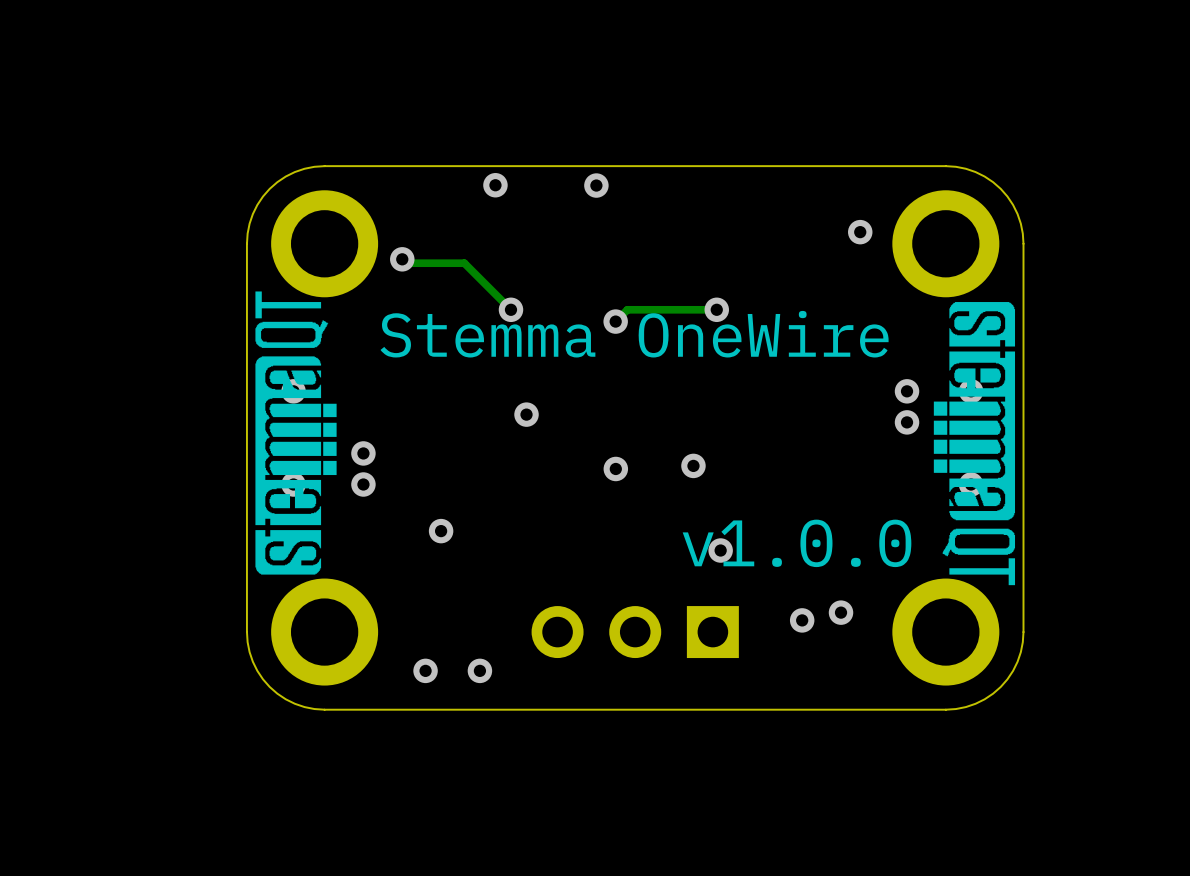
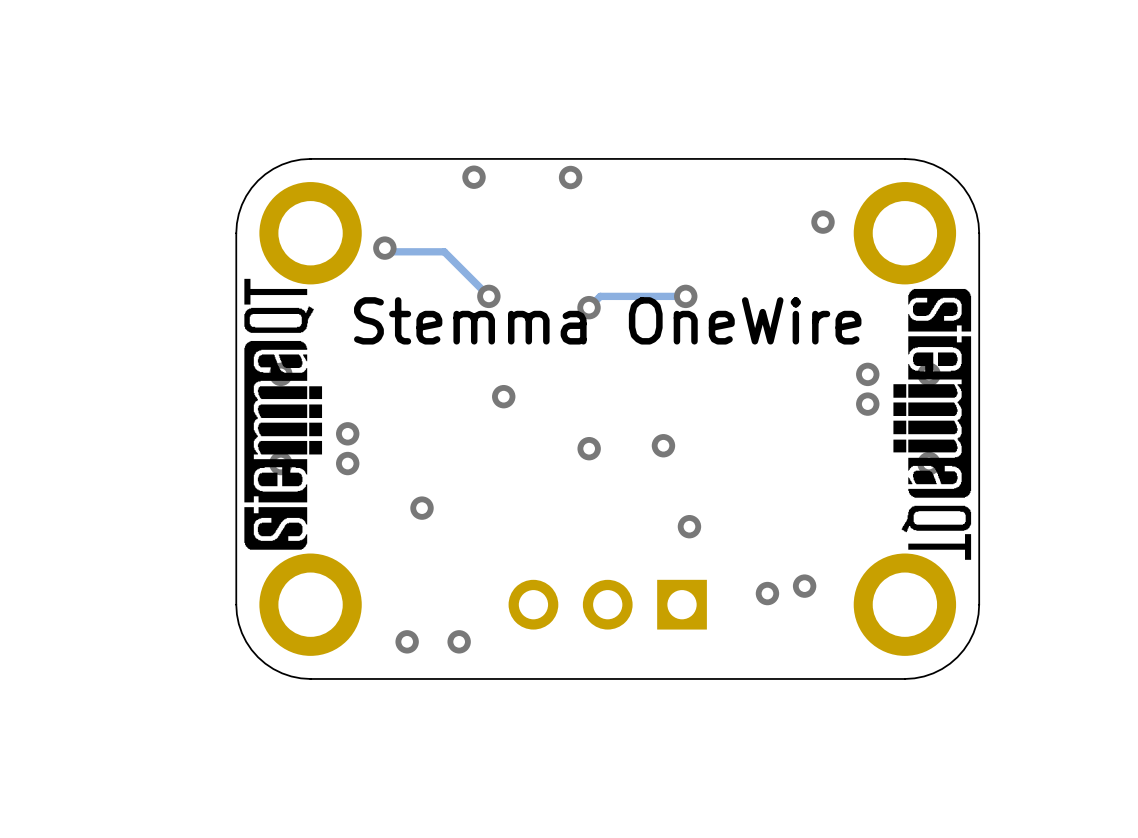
text: v1.0.0 (797, 543) -> none

